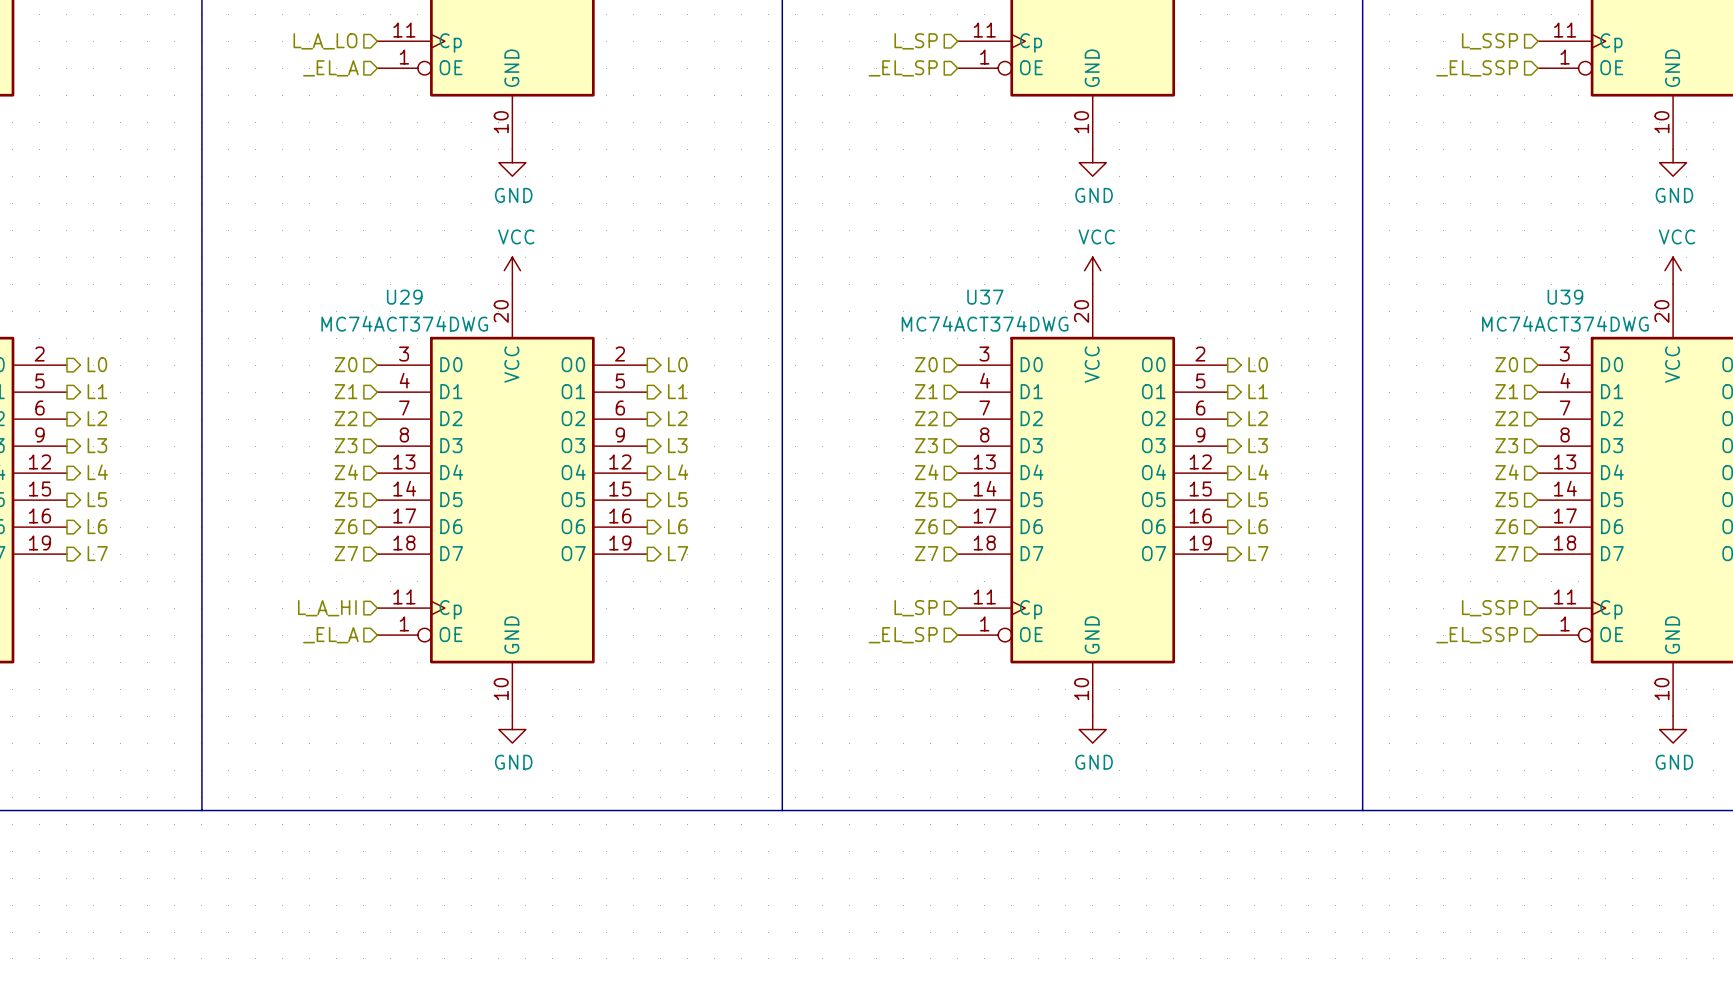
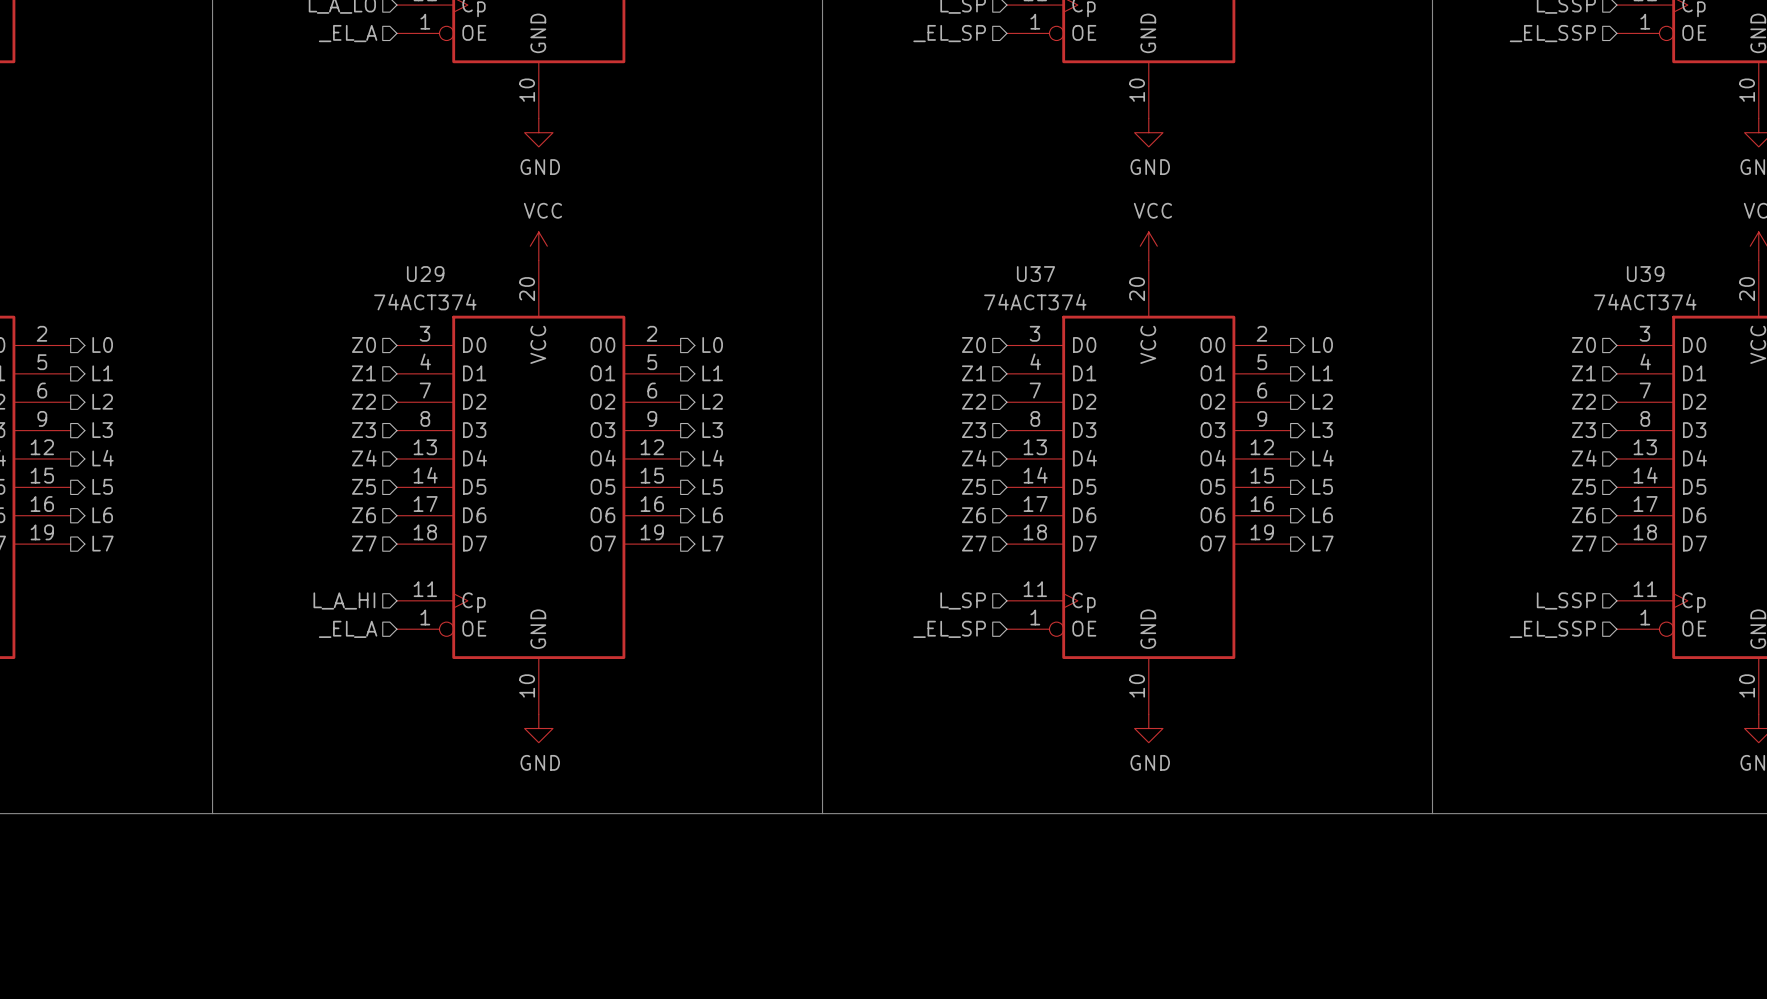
U29 value: MC74ACT374DWG (404, 323) -> 74ACT374 (425, 302)
U37 value: MC74ACT374DWG (985, 323) -> 74ACT374 (1035, 302)
U39 value: MC74ACT374DWG (1565, 323) -> 74ACT374 (1645, 302)

